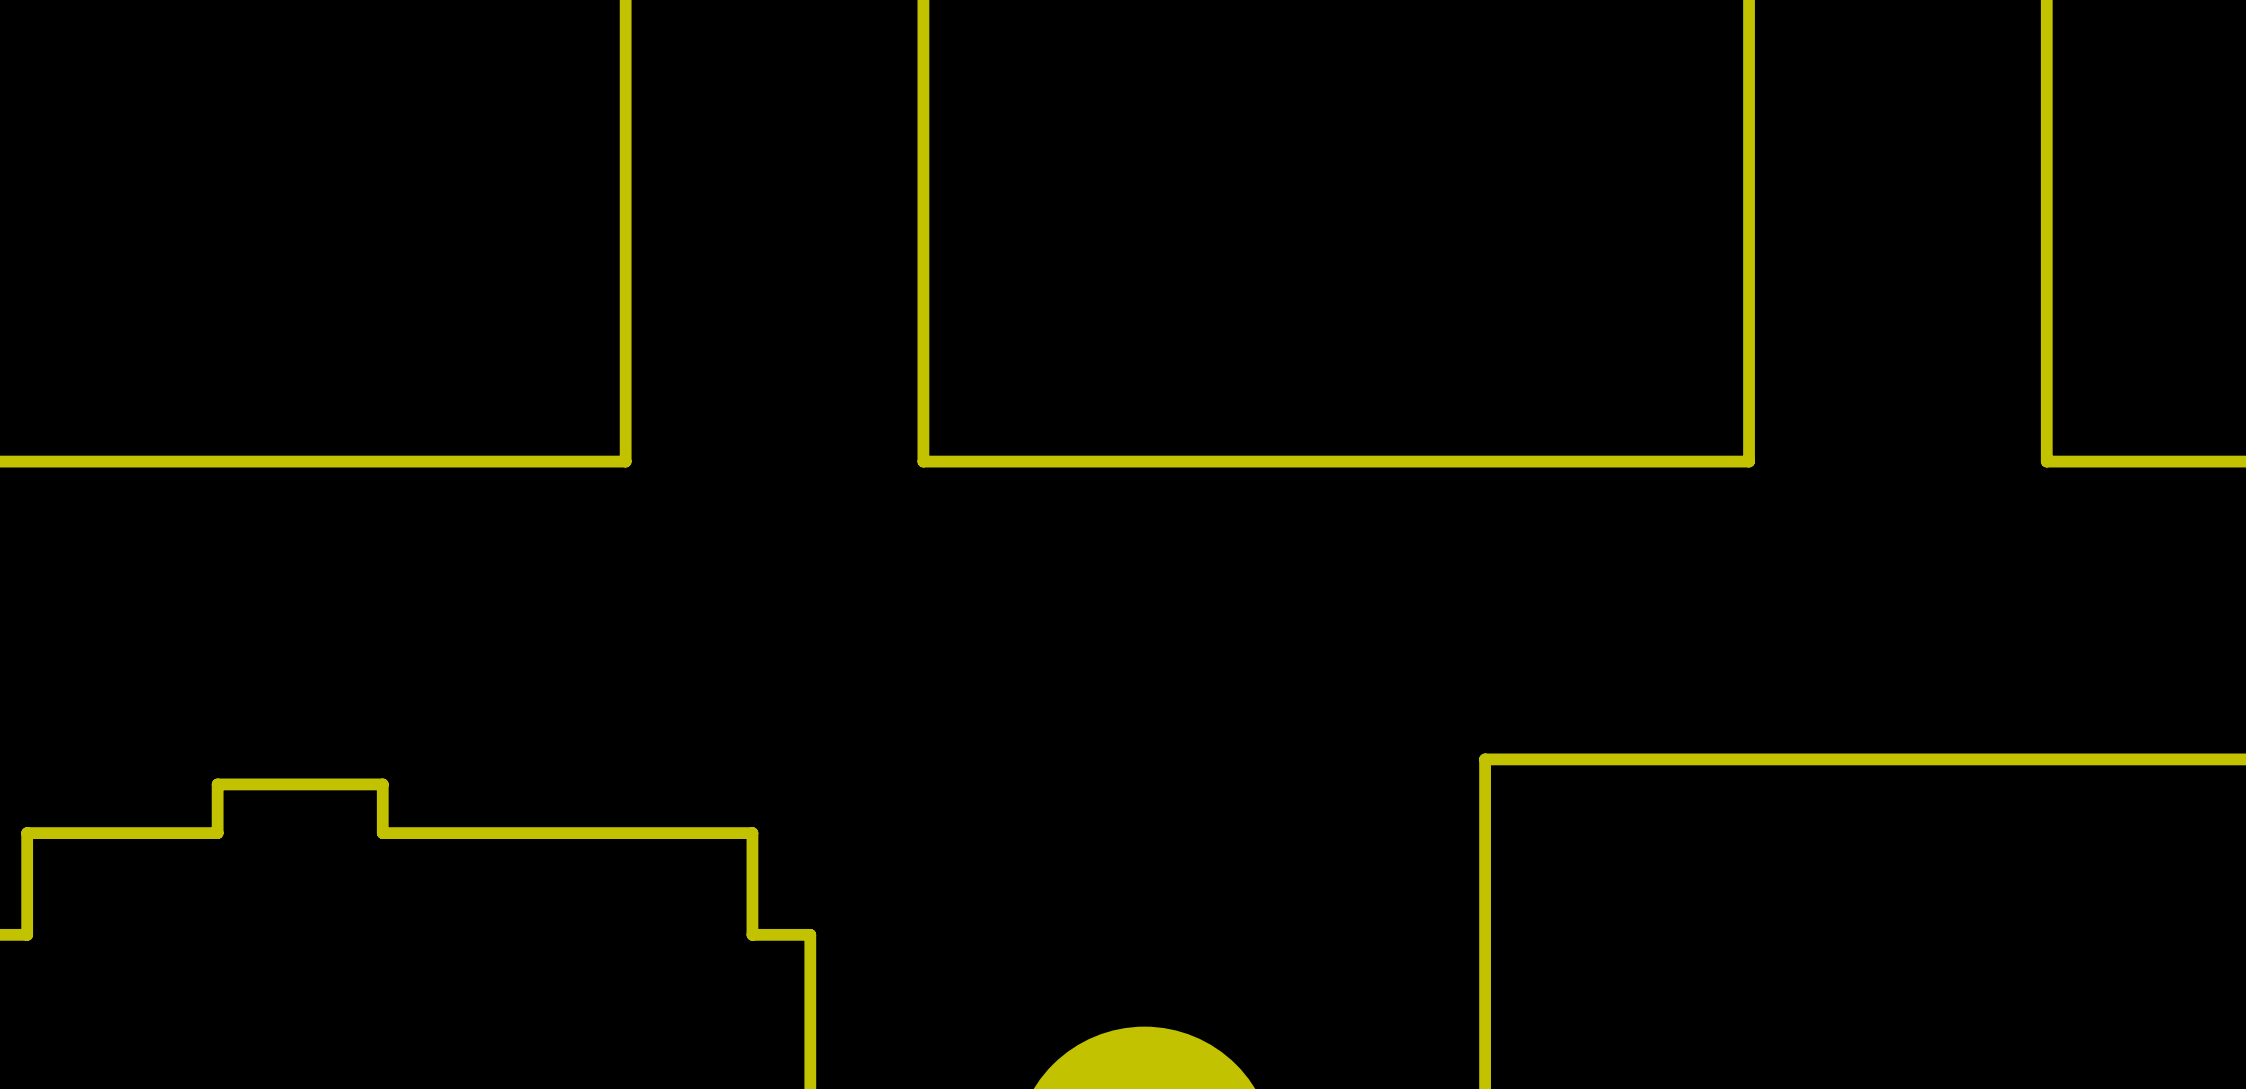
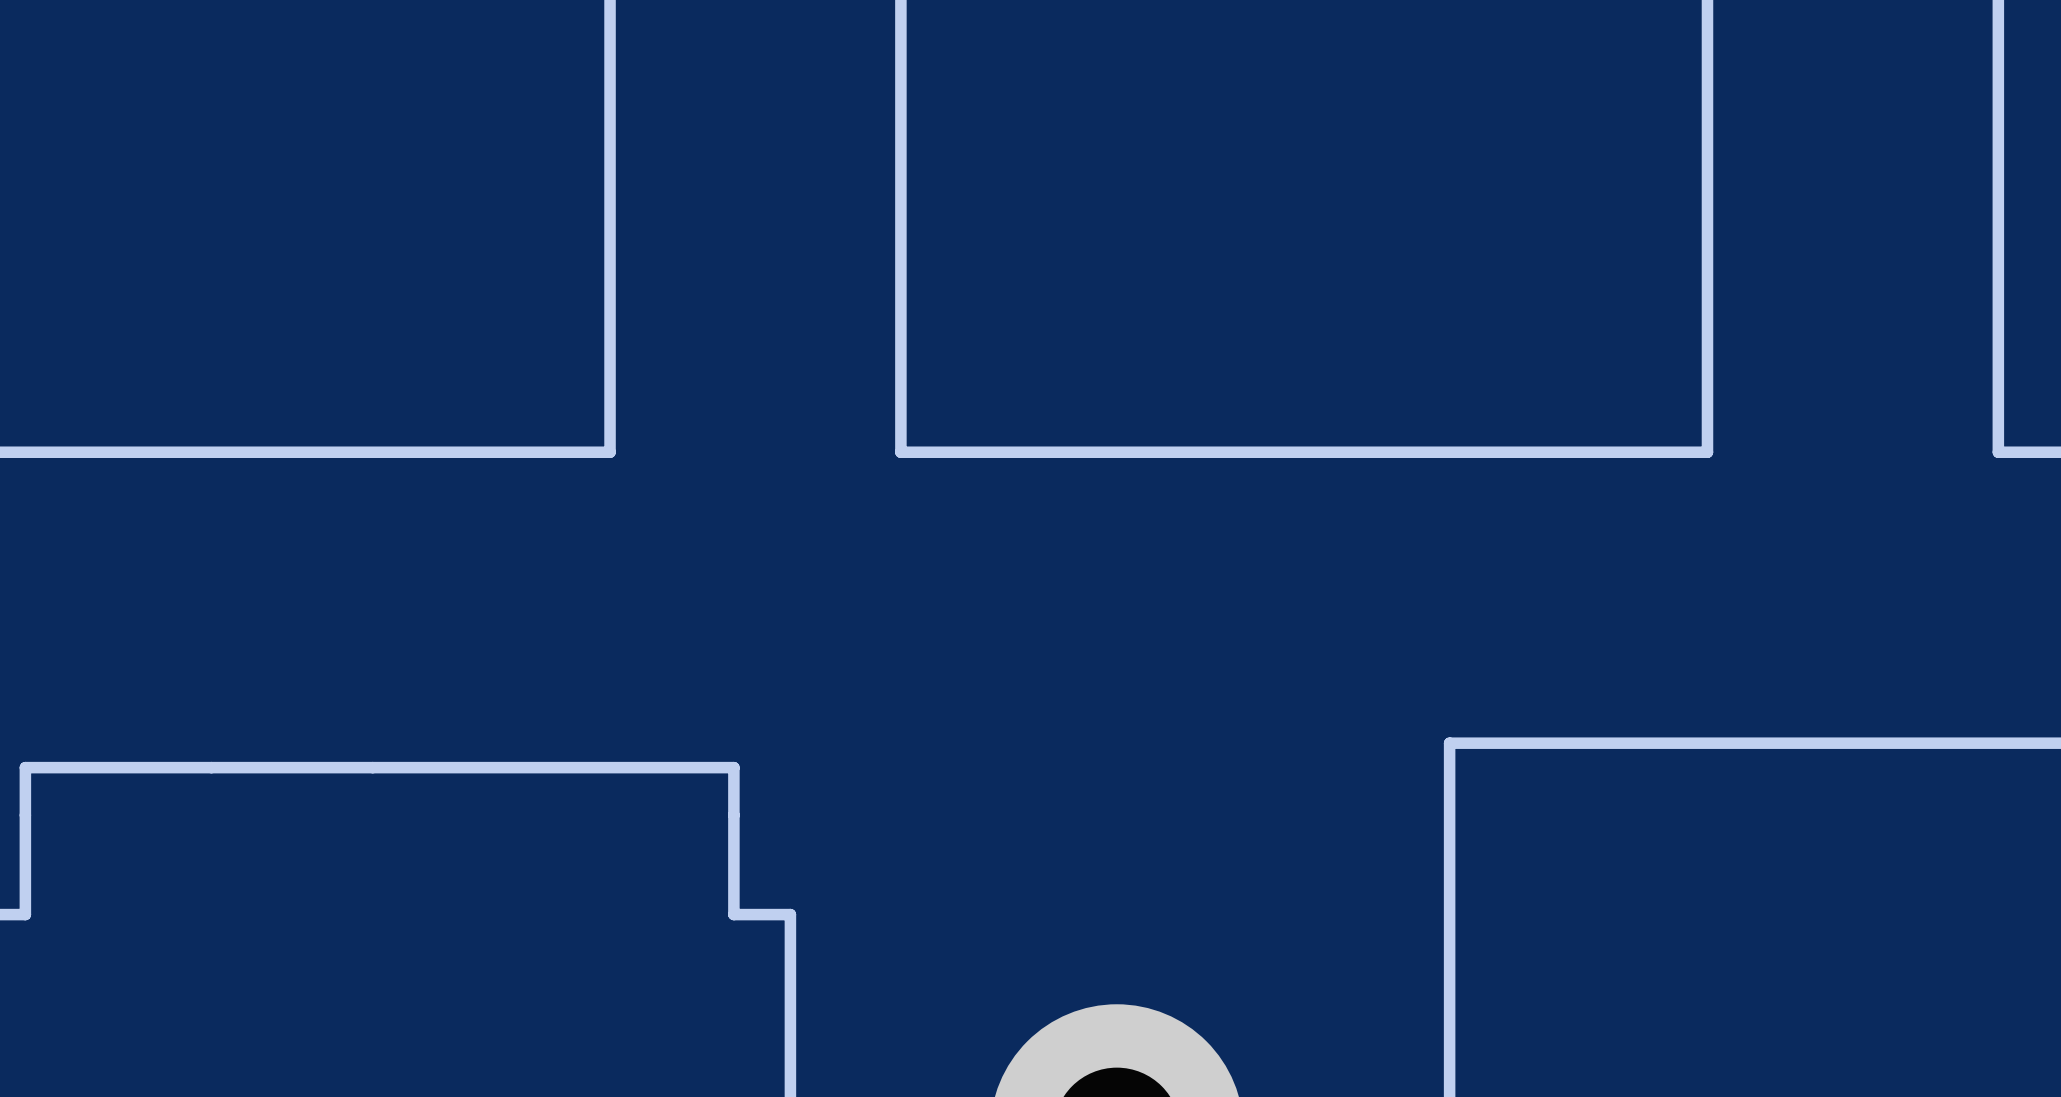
board edge: (217, 784) (217, 833) (27, 833) -> (211, 767) (25, 767) (25, 815)
board edge: (382, 784) (382, 833) (752, 833) -> (372, 767) (733, 767) (733, 815)

